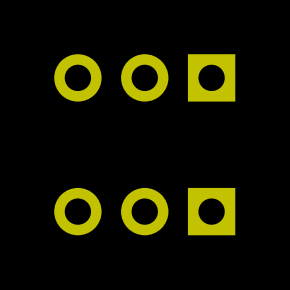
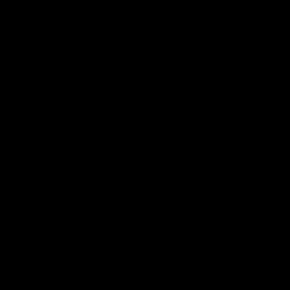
part: (144, 77) -> none
part: (144, 211) -> none

